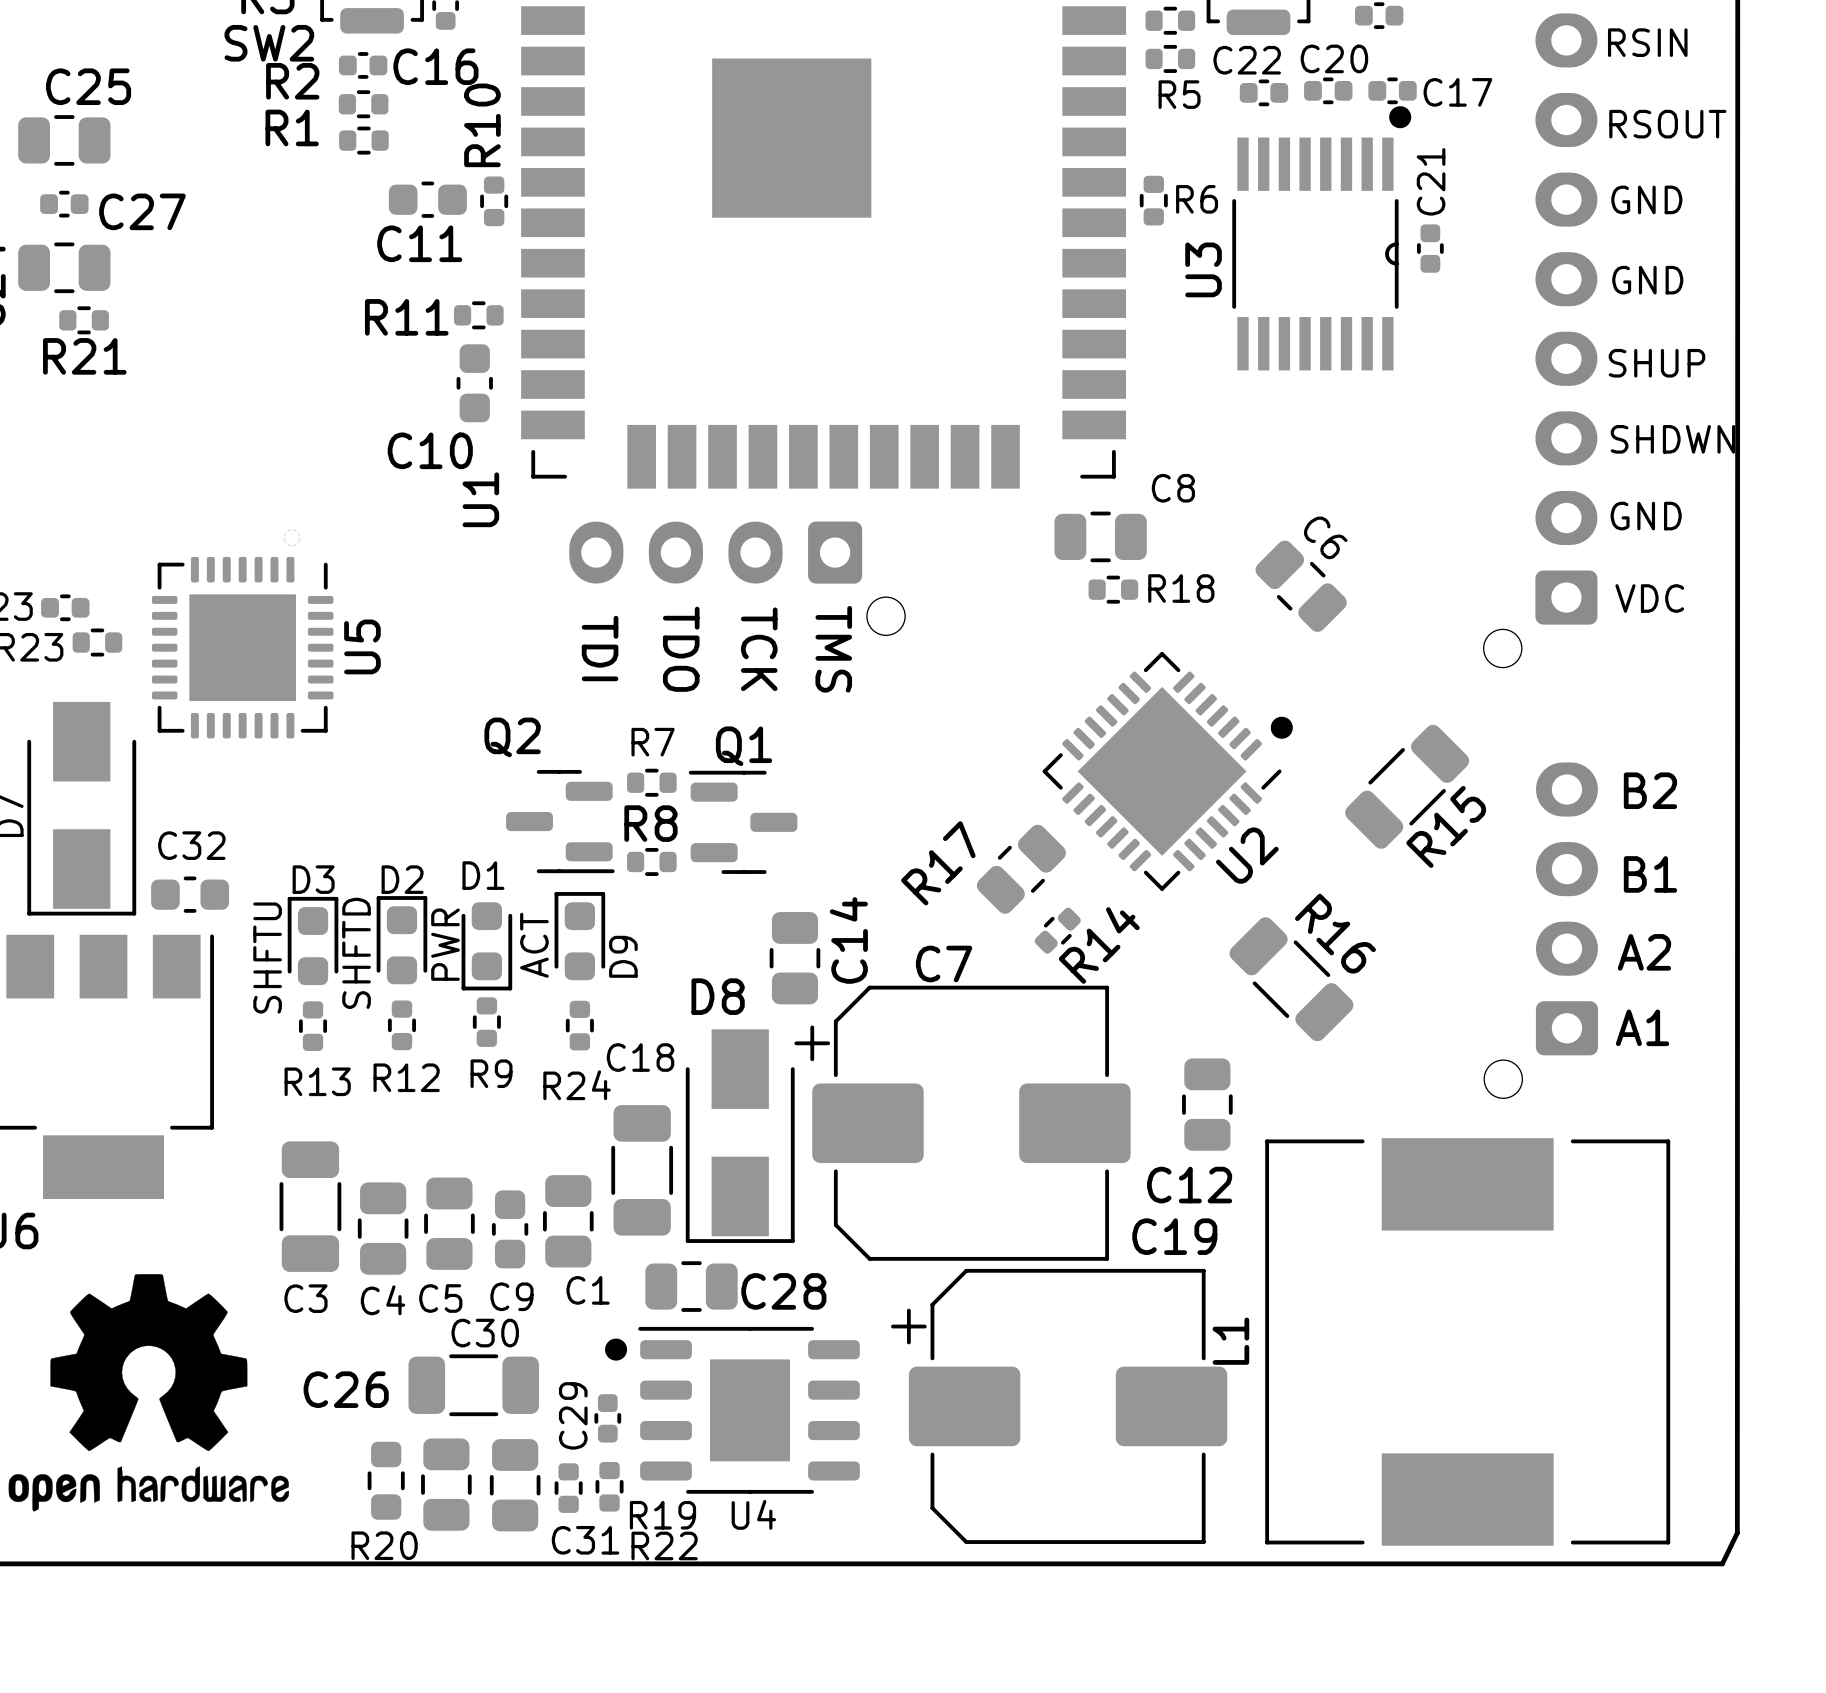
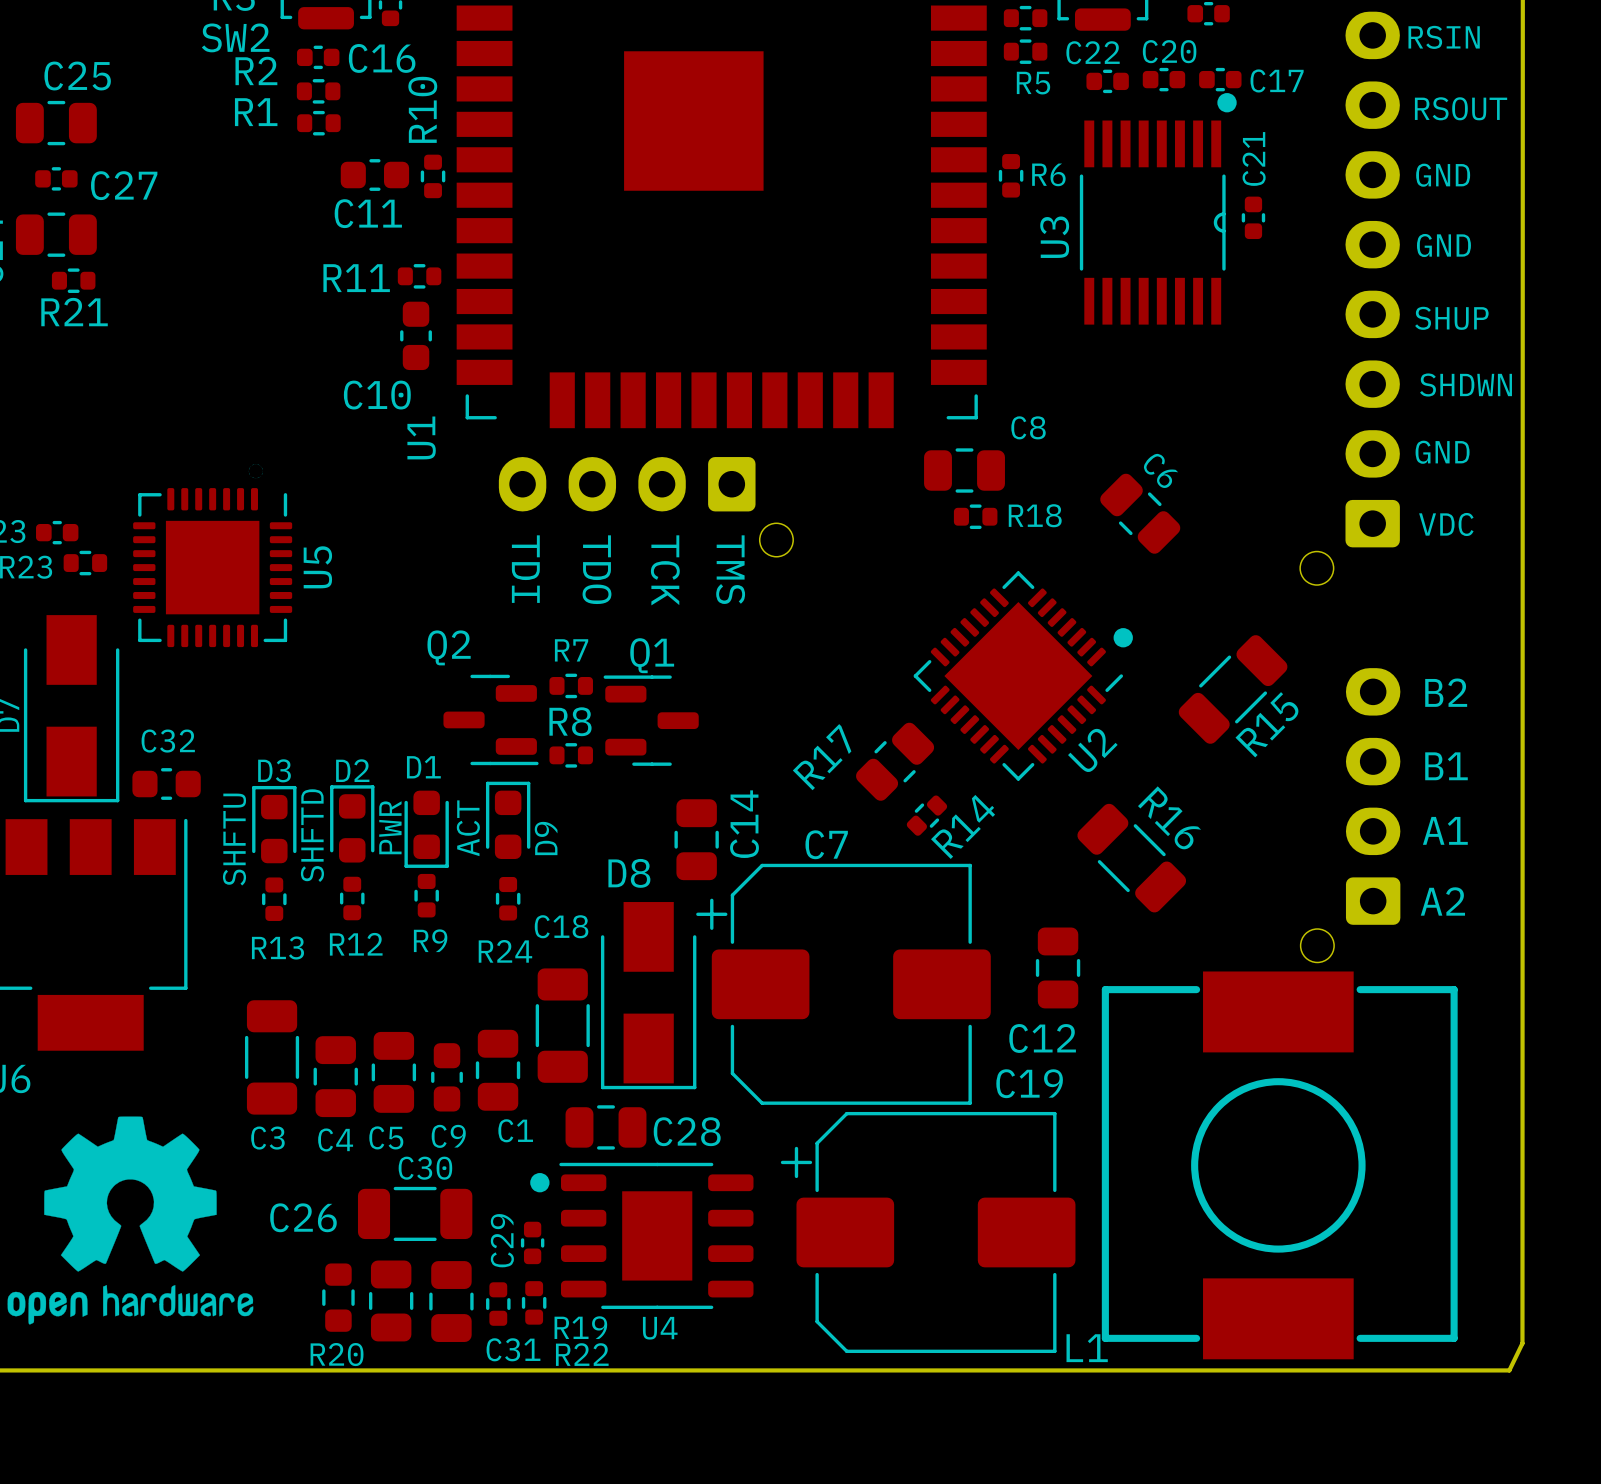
text: A2 (1644, 952) -> A1 (1445, 830)
text: A1 (1642, 1027) -> A2 (1442, 901)
L1 footprint: [1265, 1138, 1671, 1546] -> [1101, 971, 1458, 1360]
L1 name position: L1 (1230, 1341) -> L1 (1087, 1348)

